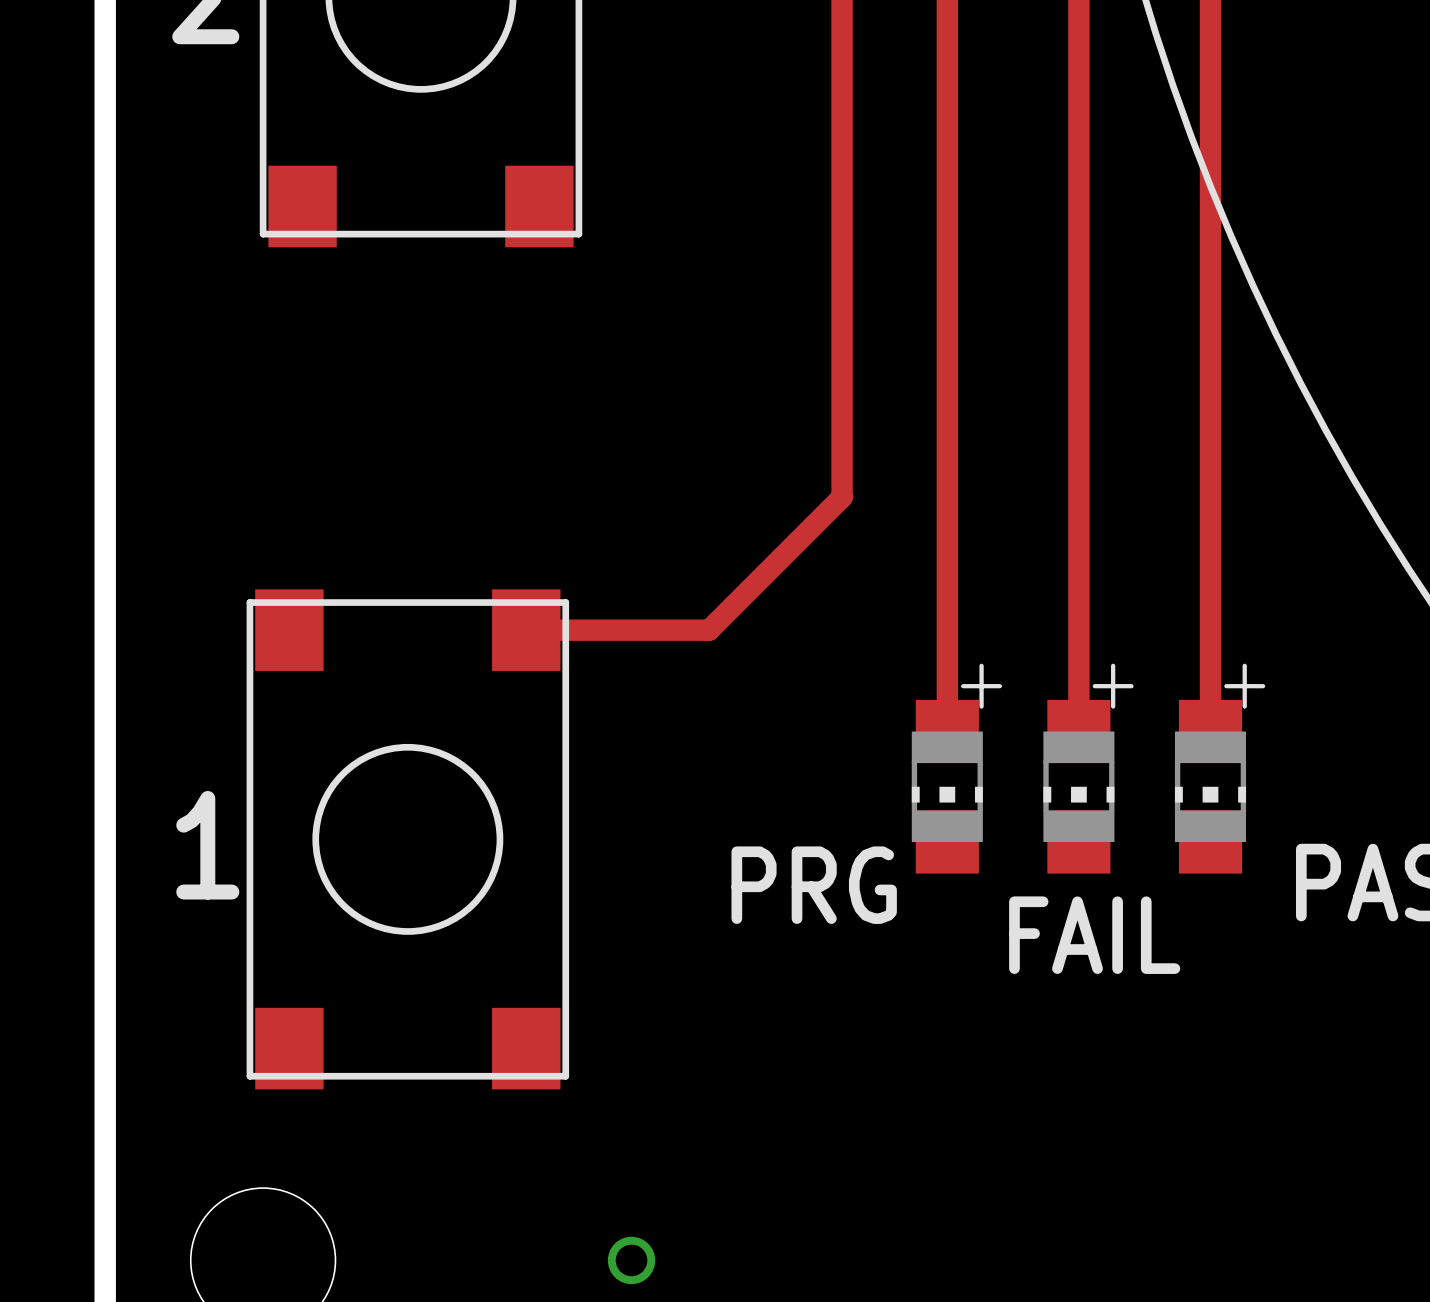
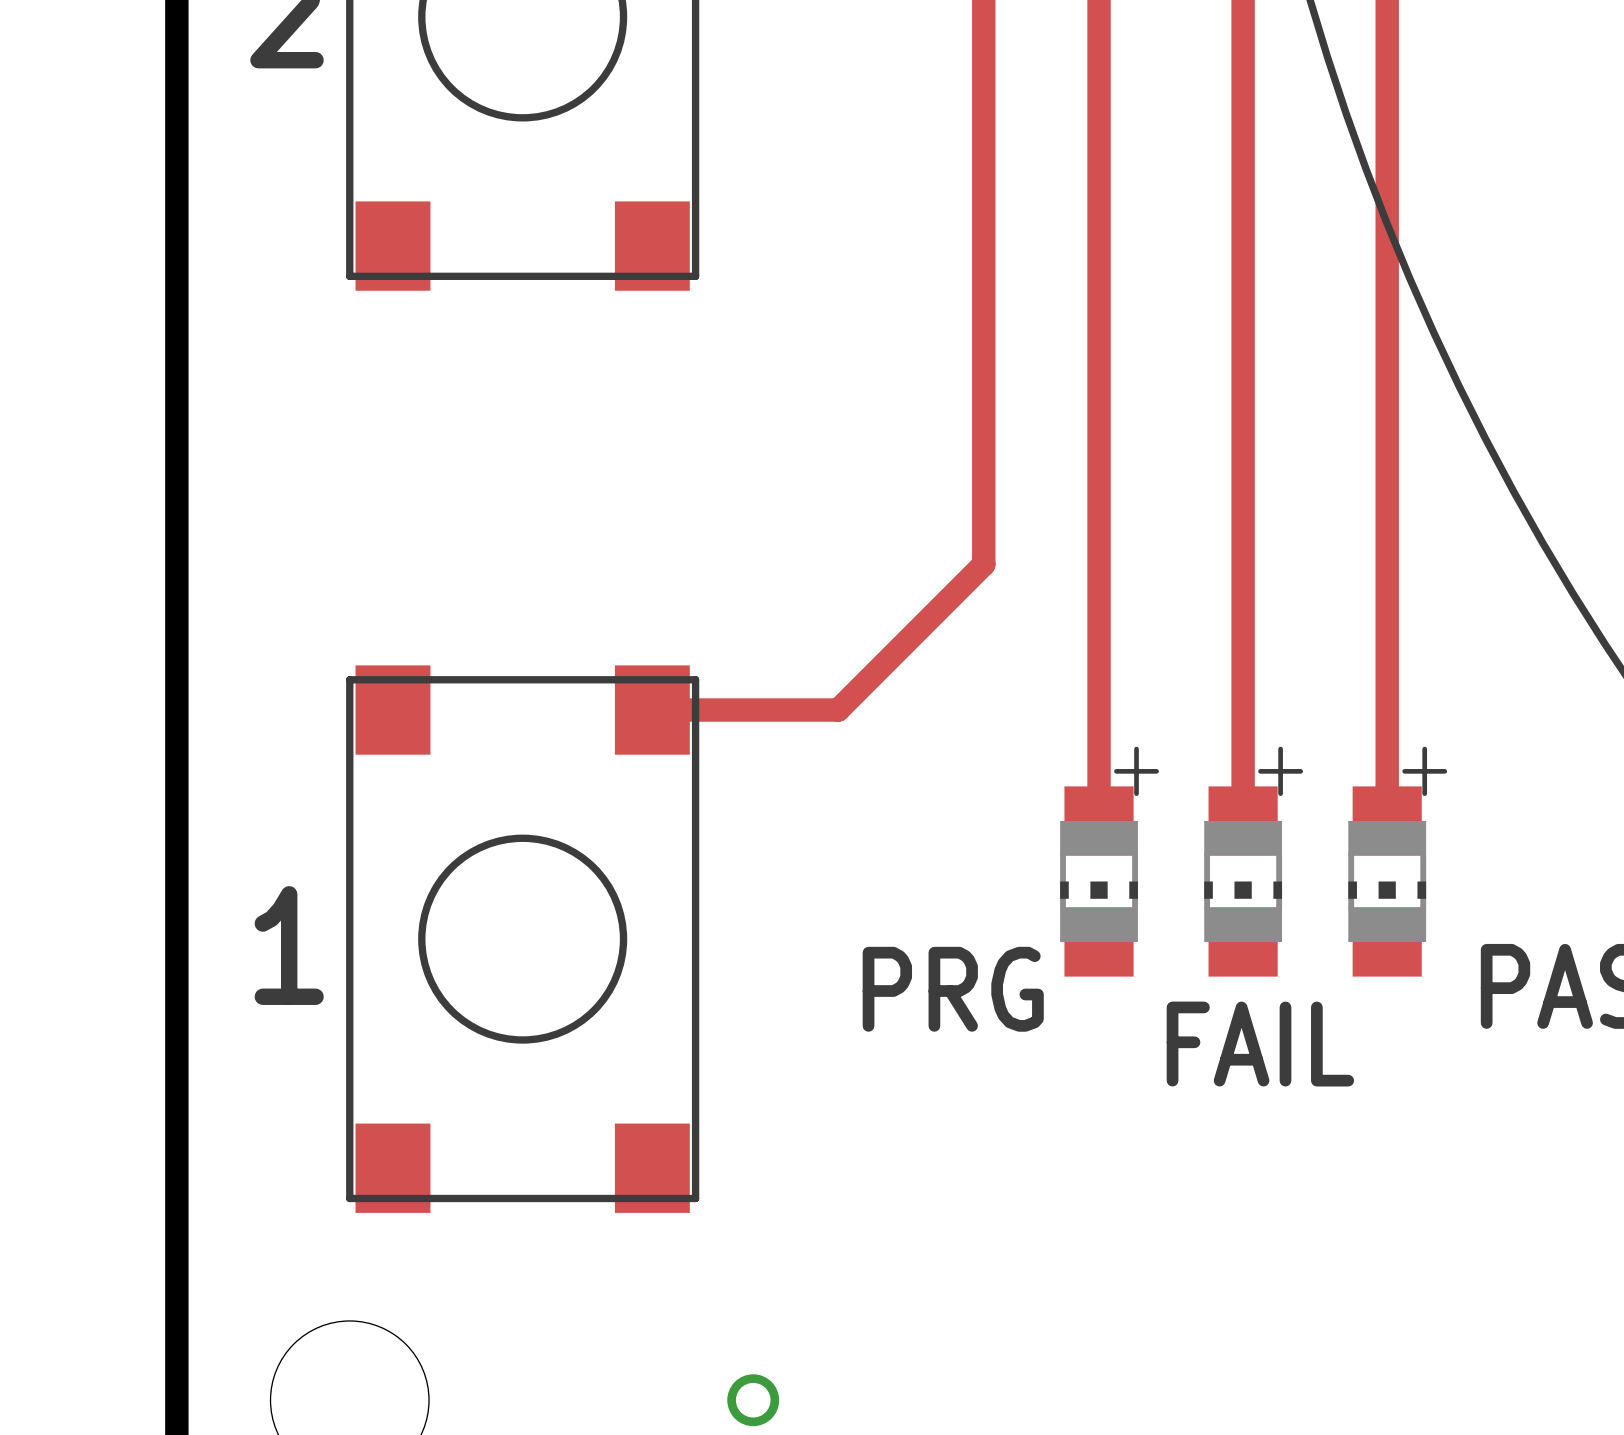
part position: (407, 839) -> (522, 939)

